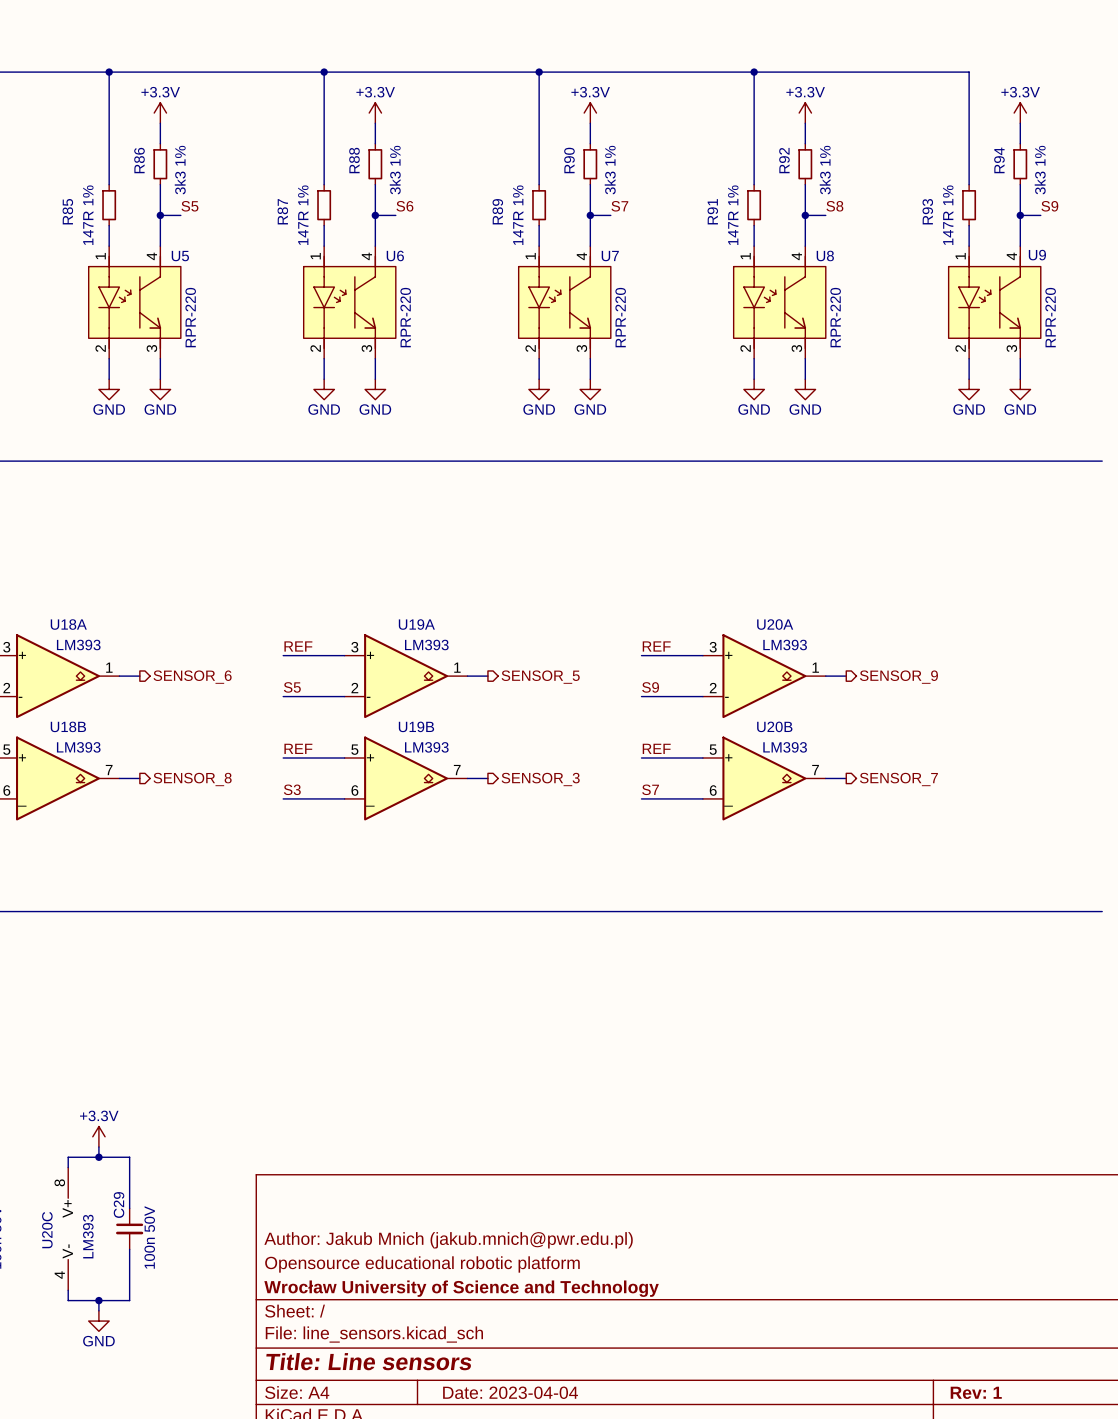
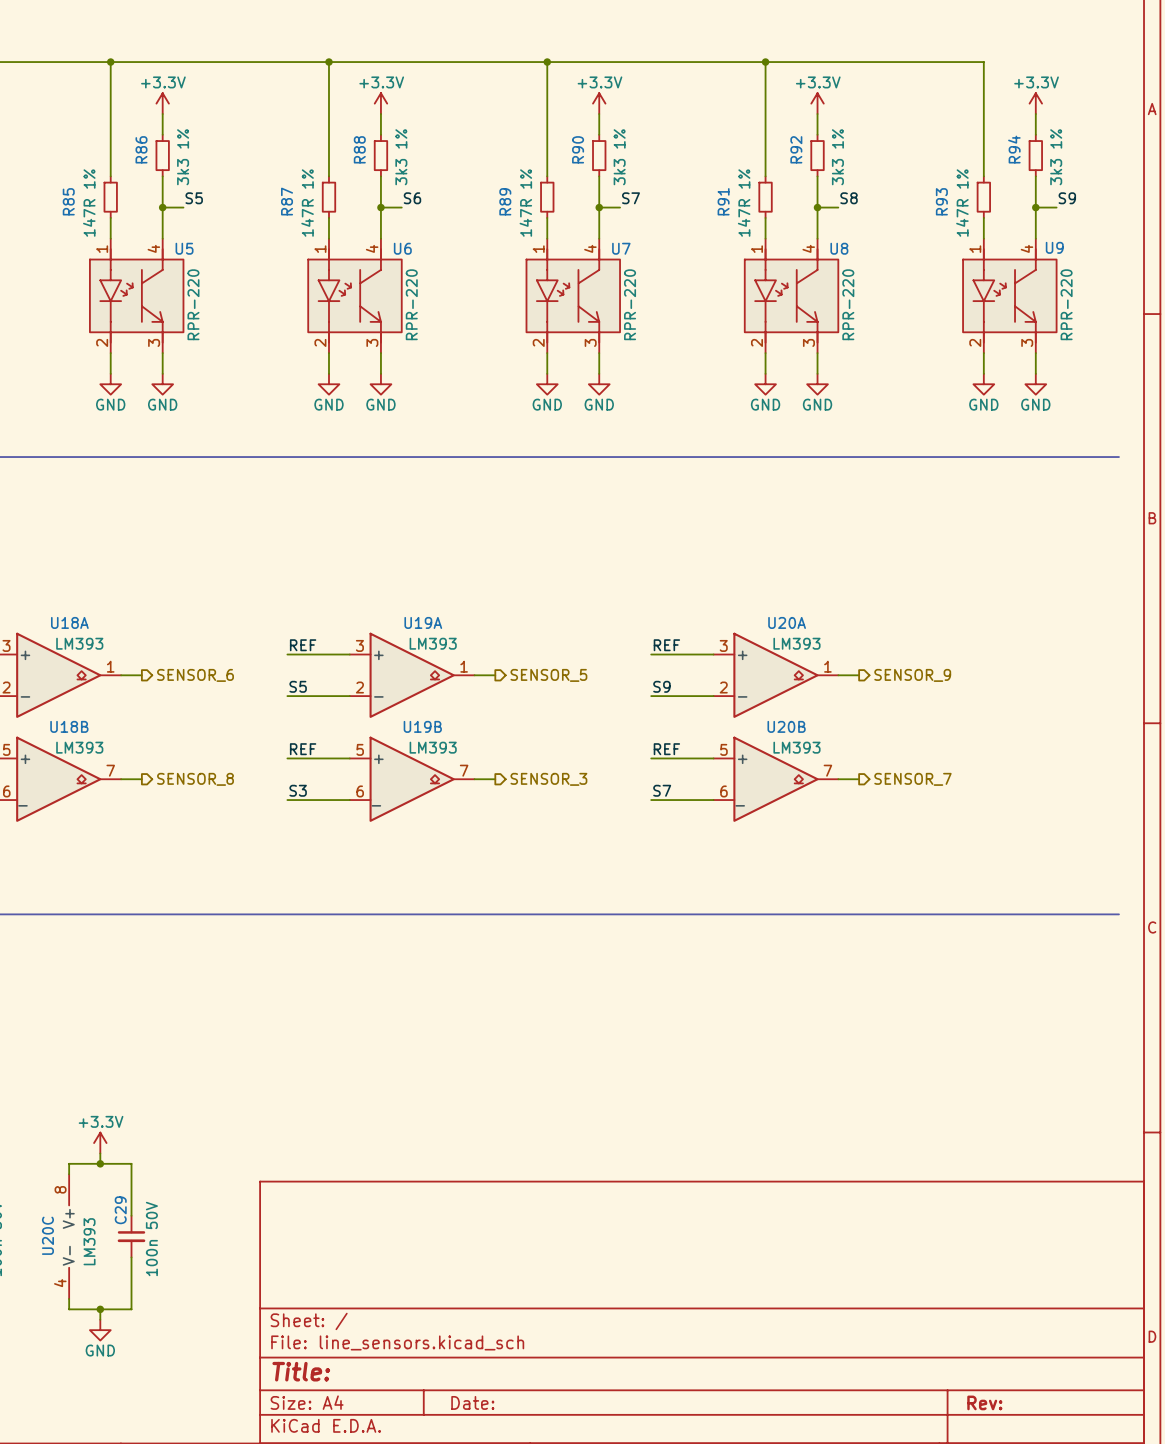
title block: Author: Jakub Mnich (jakub.mnich@pwr.edu.pl) (448, 1240) -> none
title block: Opensource educational robotic platform (422, 1264) -> none
title block: Wrocław University of Science and Technology (461, 1288) -> none
title block: Title: Line sensors (368, 1361) -> Title: (301, 1371)
title block: Date: 2023-04-04 (510, 1392) -> Date: (472, 1402)
title block: Rev: 1 (976, 1392) -> Rev: (984, 1402)

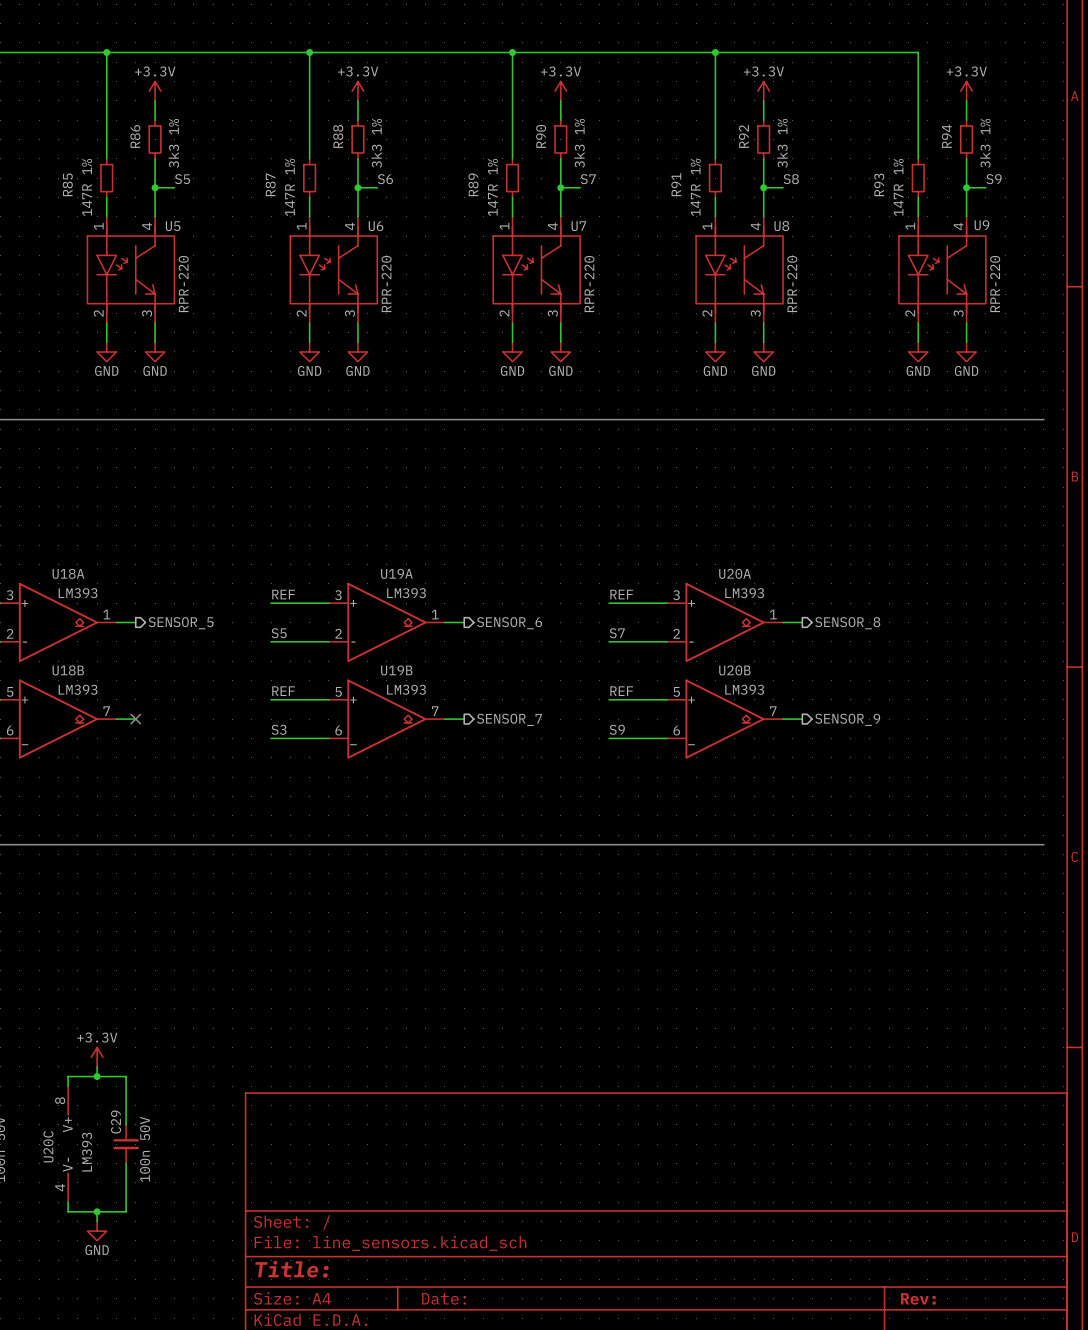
hierarchical label: SENSOR_6 (195, 675) -> SENSOR_5 (181, 623)
hierarchical label: SENSOR_5 (548, 675) -> SENSOR_6 (509, 623)
hierarchical label: SENSOR_9 (912, 675) -> SENSOR_8 (847, 623)
label: S9 (661, 686) -> S7 (617, 633)
no-connect mark: none -> (135, 719)
hierarchical label: SENSOR_8 (195, 779) -> none
hierarchical label: SENSOR_3 (548, 779) -> SENSOR_7 (509, 719)
hierarchical label: SENSOR_7 (912, 779) -> SENSOR_9 (847, 719)
label: S7 (662, 790) -> S9 (617, 729)

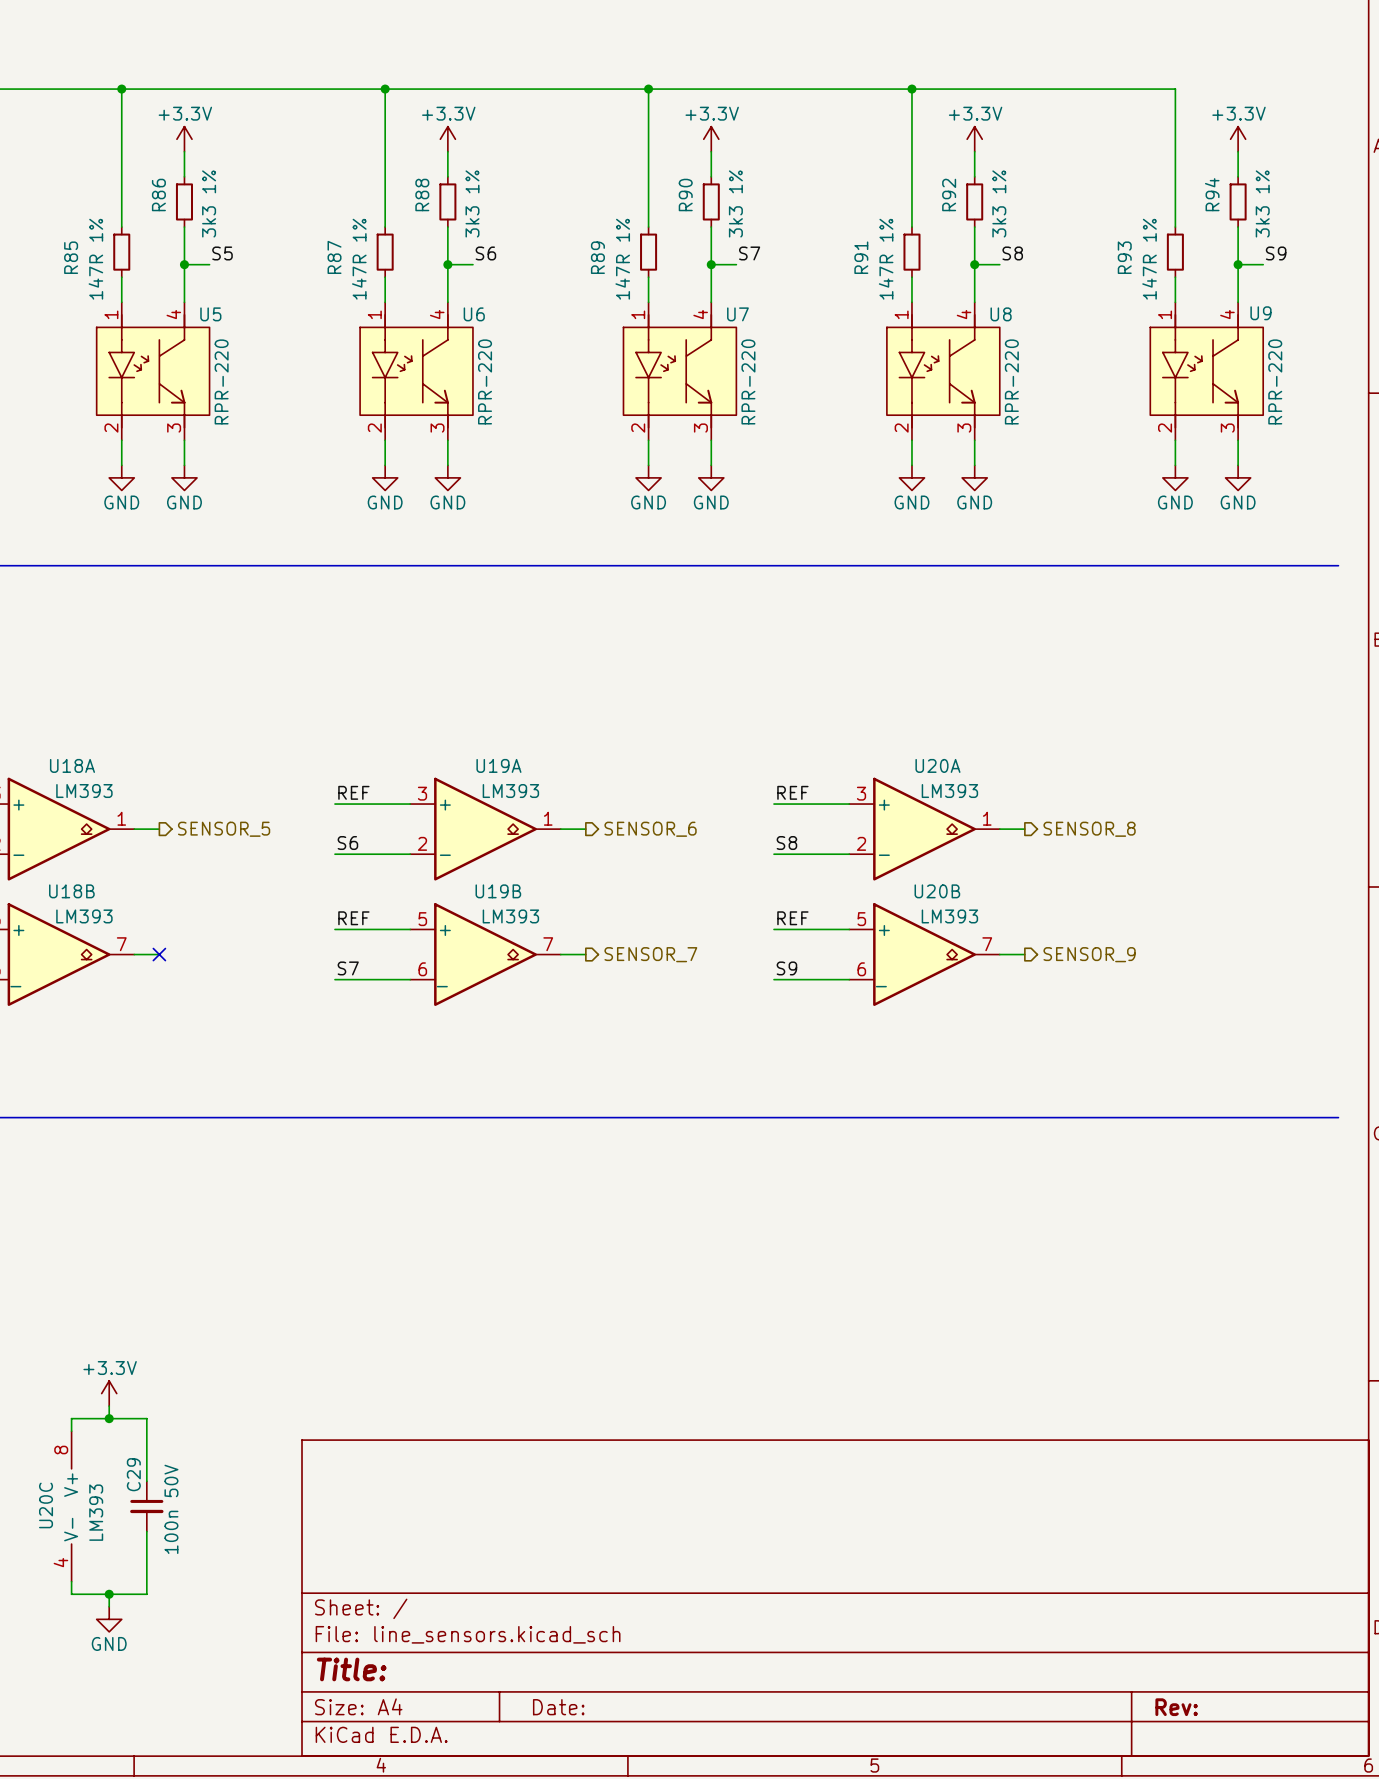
label: S5 (279, 633) -> S6 (347, 843)
label: S7 (617, 633) -> S8 (786, 843)
label: S3 (279, 729) -> S7 (348, 968)

